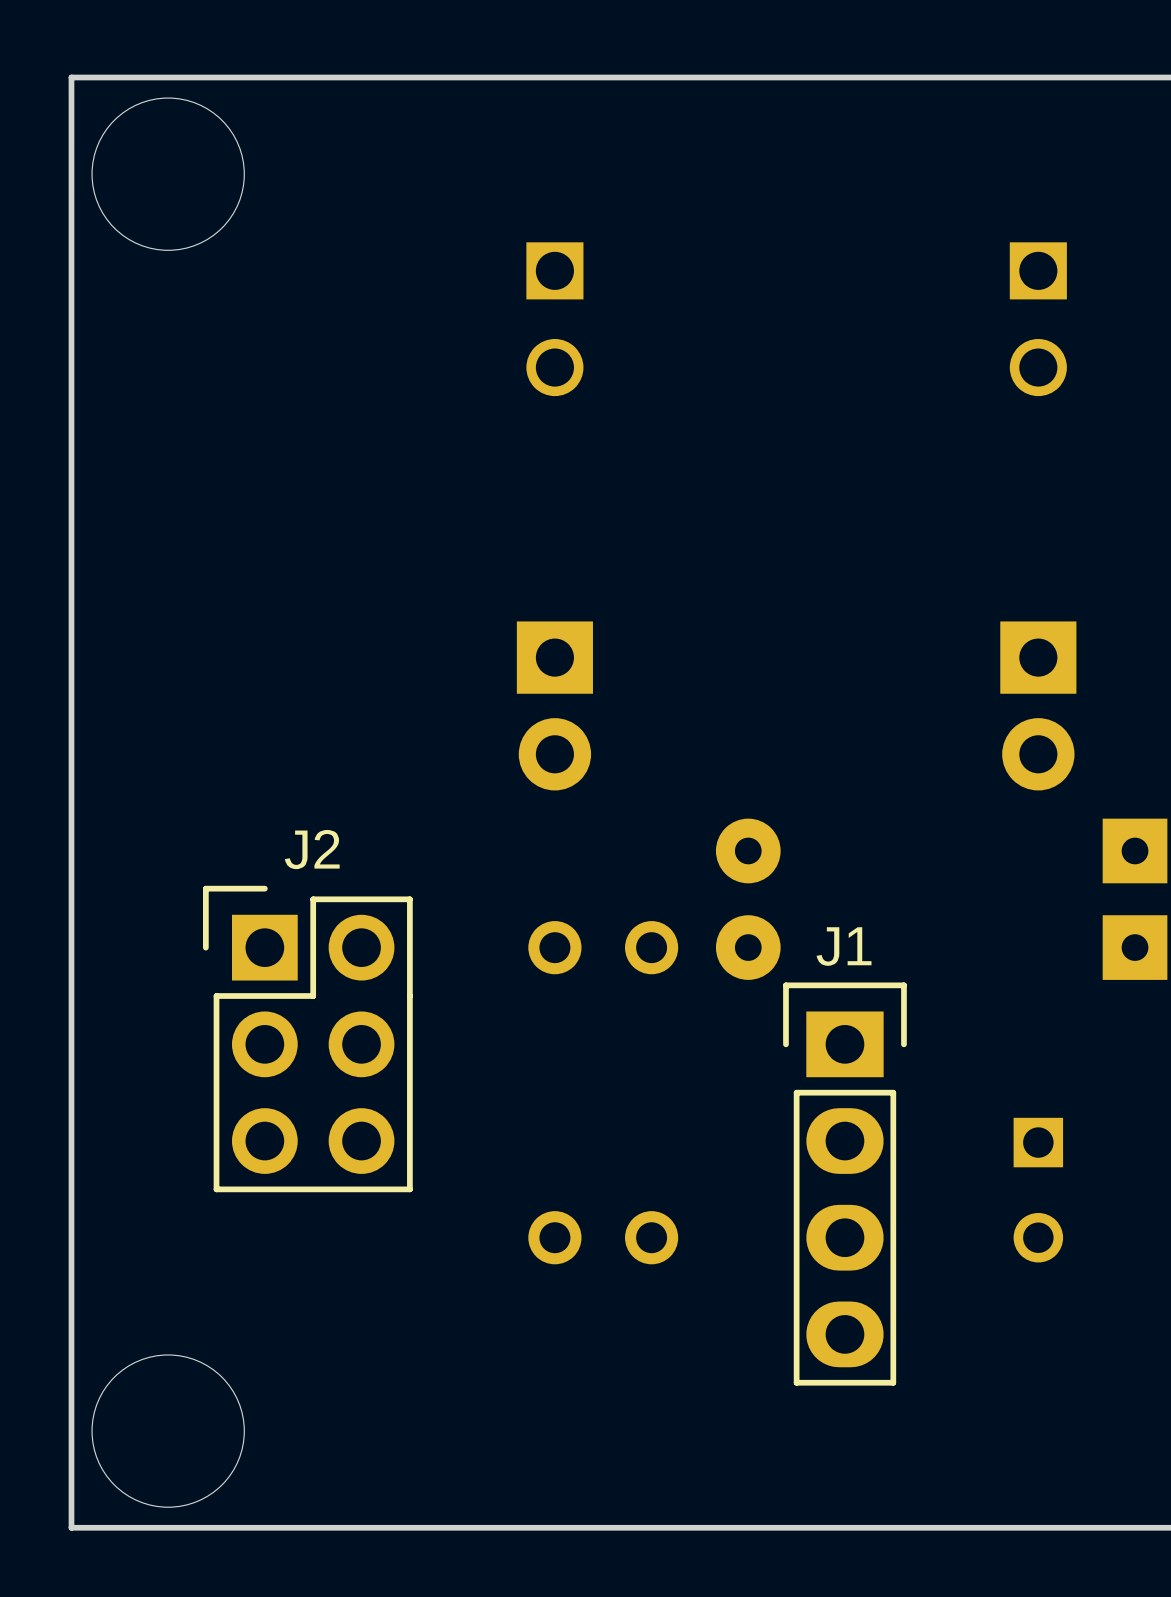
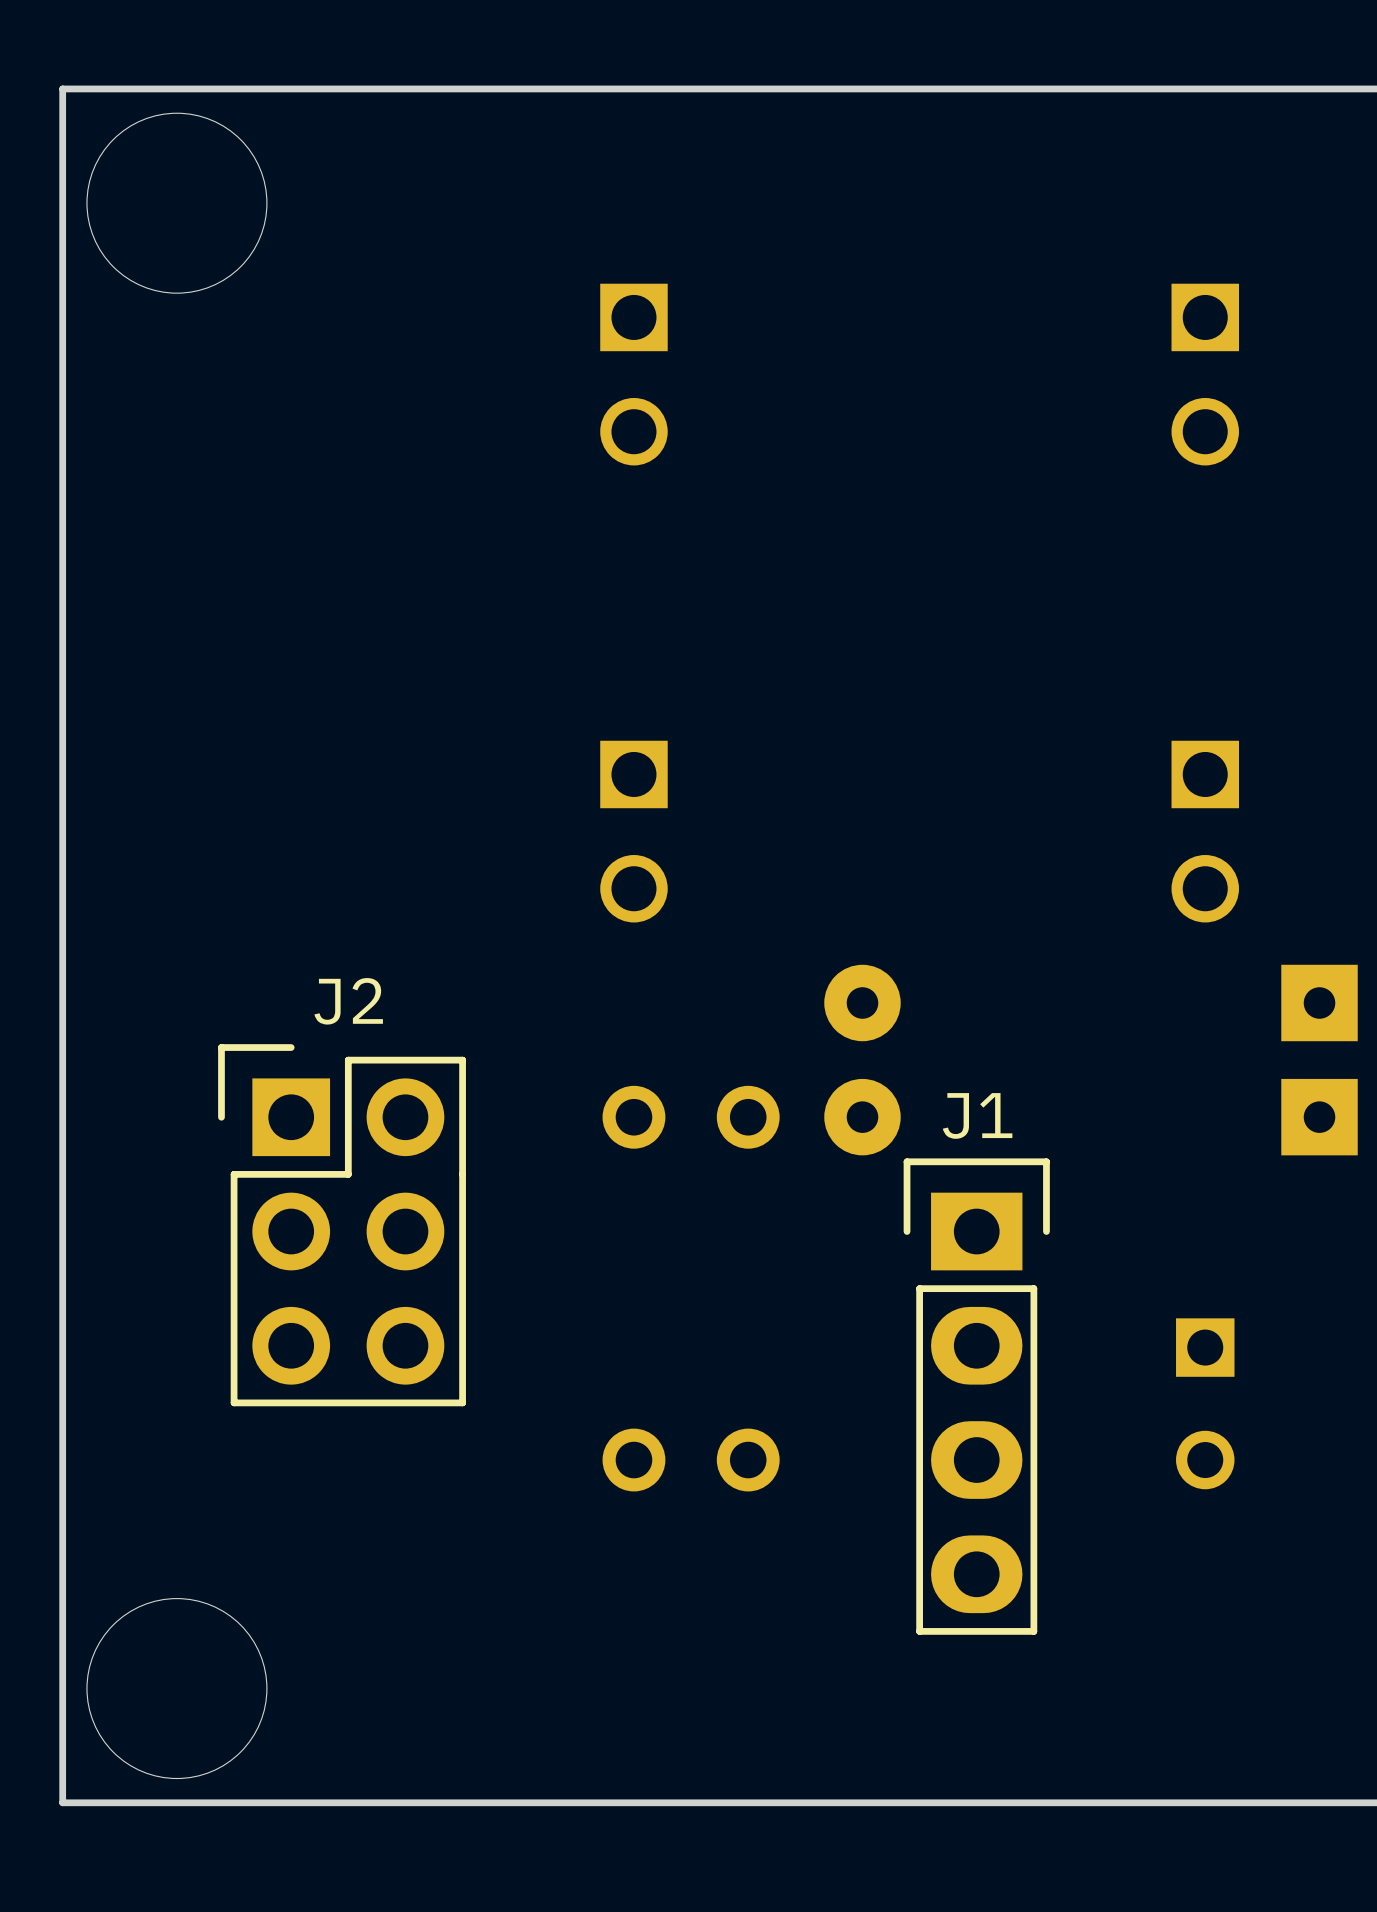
part footprint: [516, 621, 593, 791] -> [600, 740, 668, 923]
part footprint: [1000, 621, 1077, 791] -> [1171, 740, 1239, 923]

